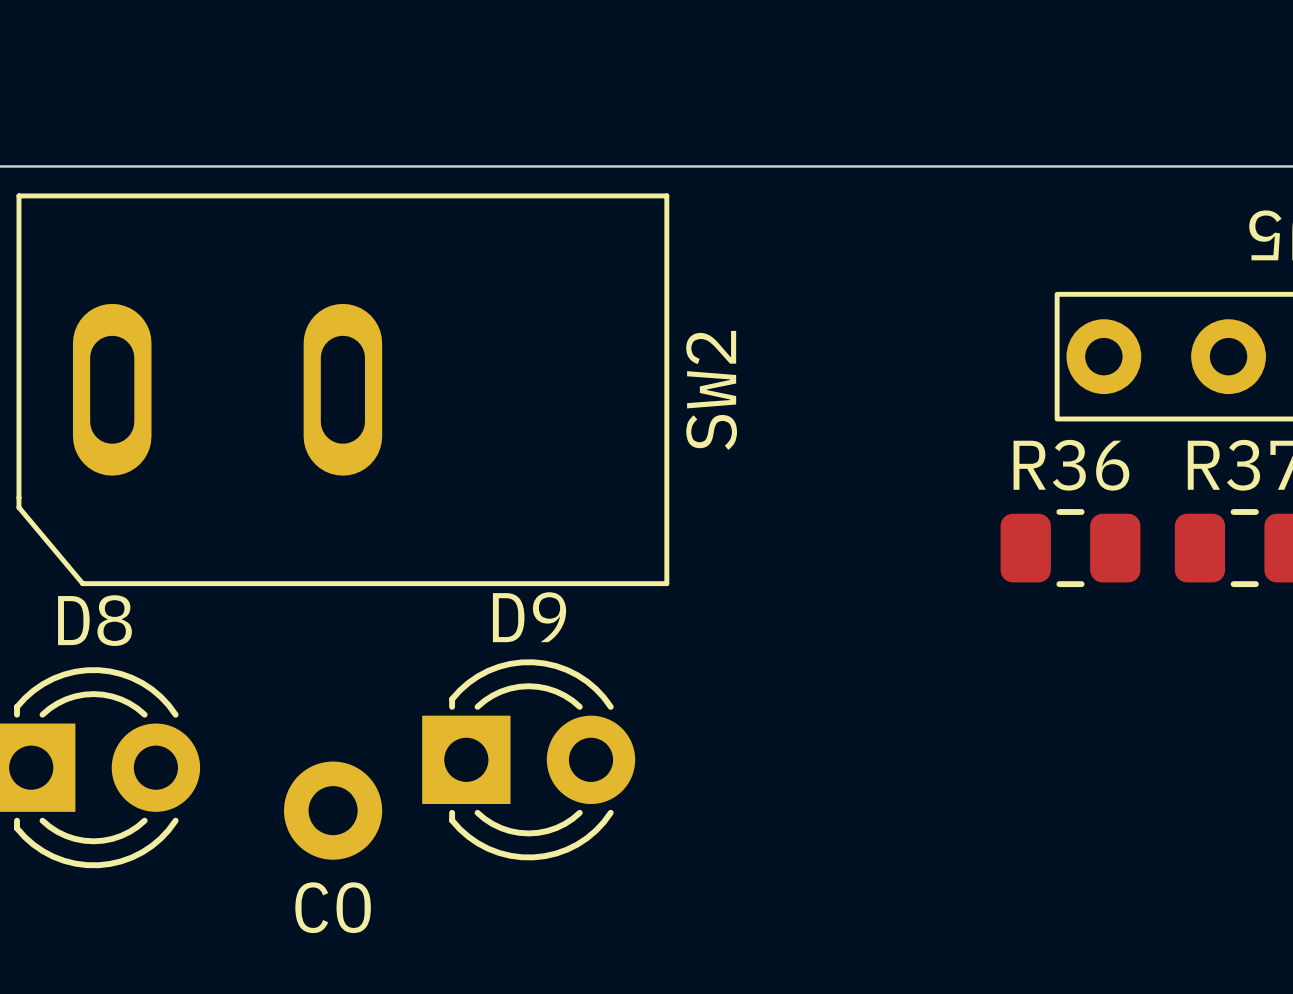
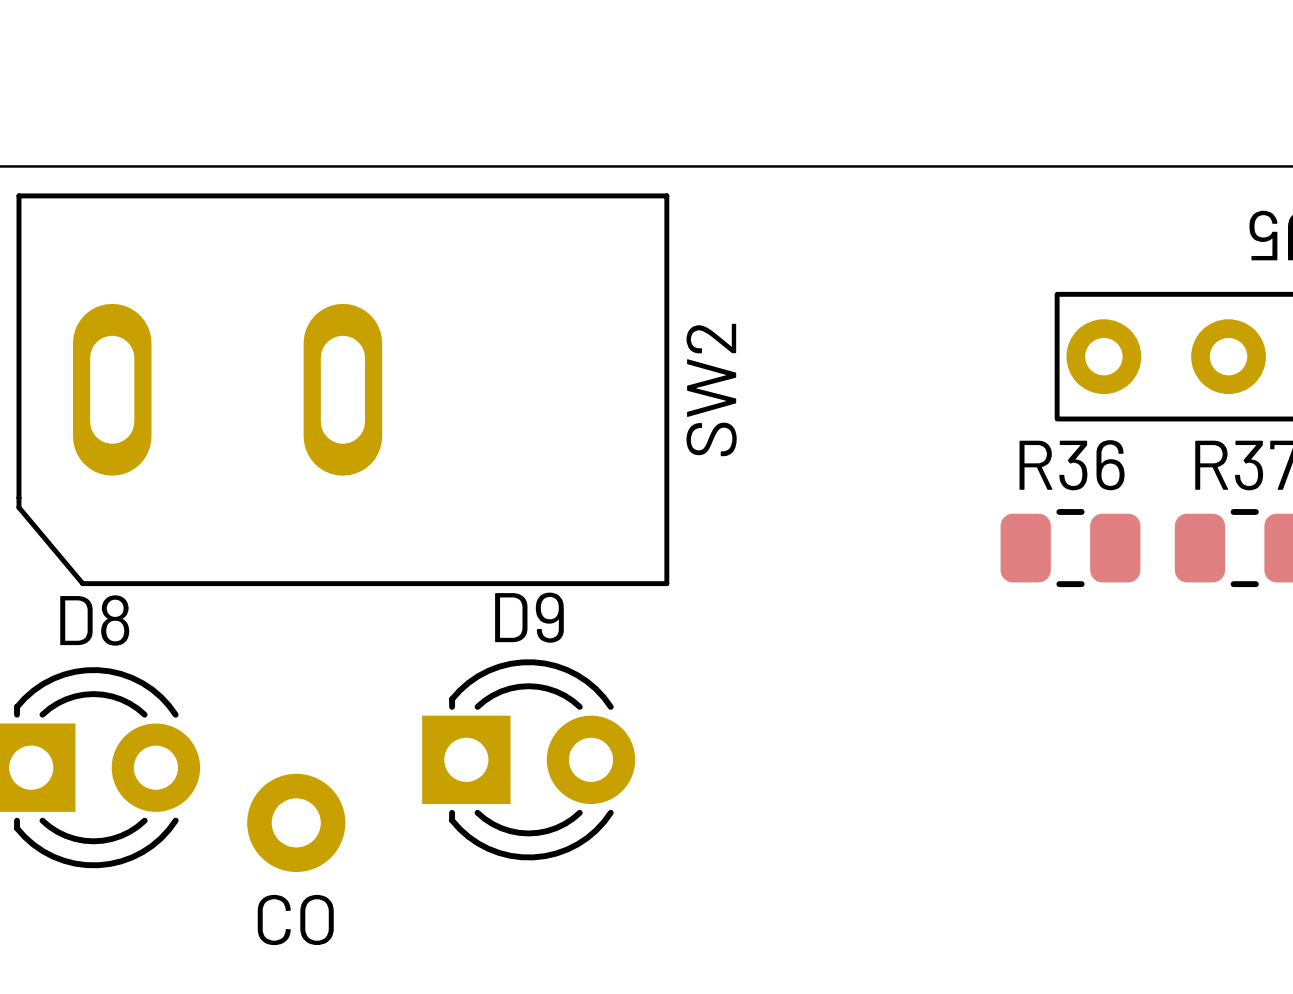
part position: (333, 810) -> (296, 822)

